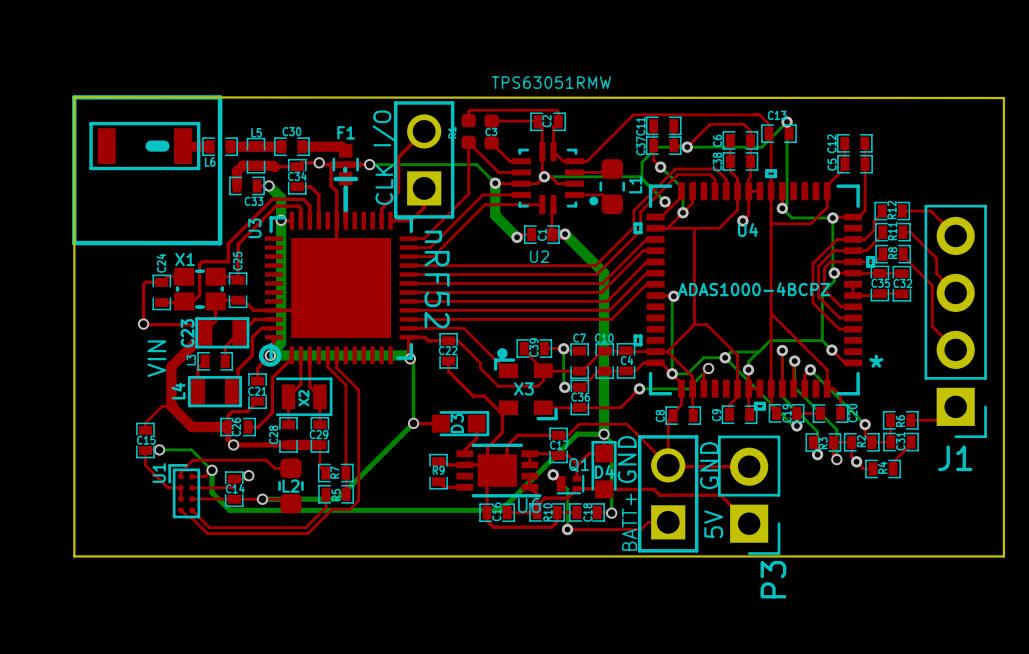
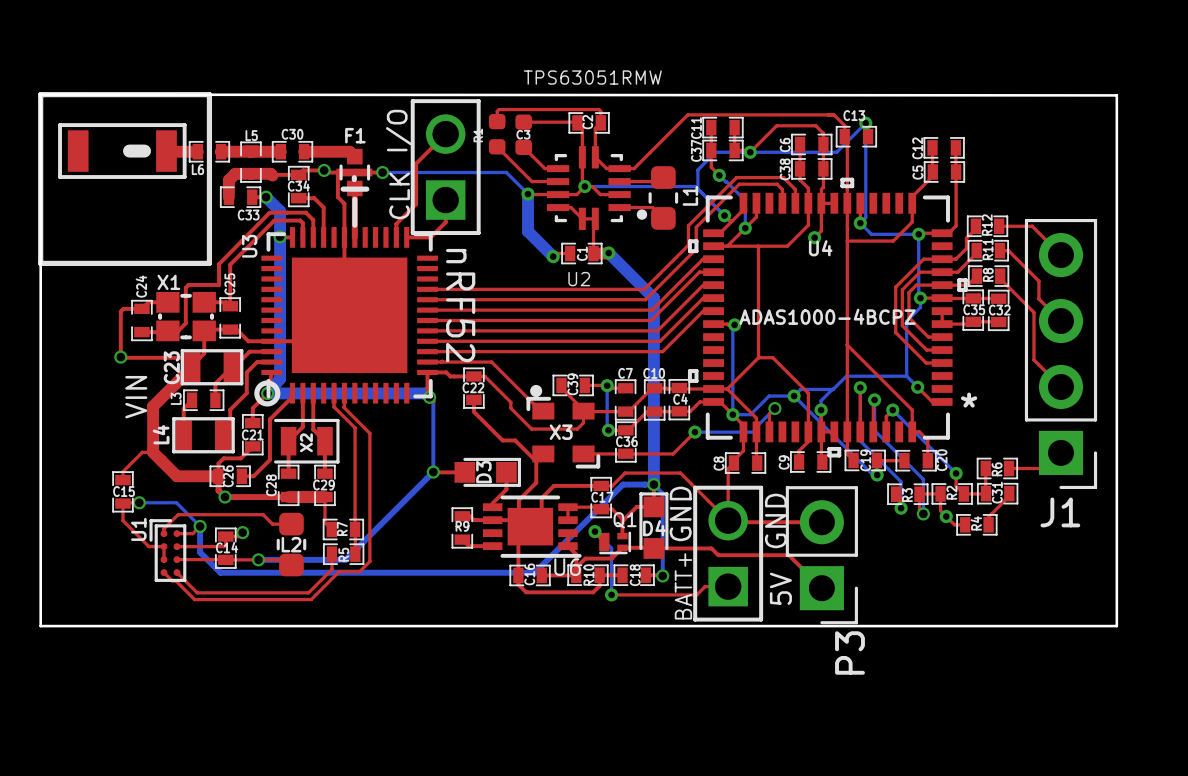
top track: (468, 142) (468, 194) (424, 238) (408, 238) -> none
top track: (521, 194) (482, 194) (430, 247) (408, 247) -> (558, 207) (571, 207) (582, 218) (595, 218)
top track: (542, 204) (485, 204) (433, 256) (408, 256) -> none

